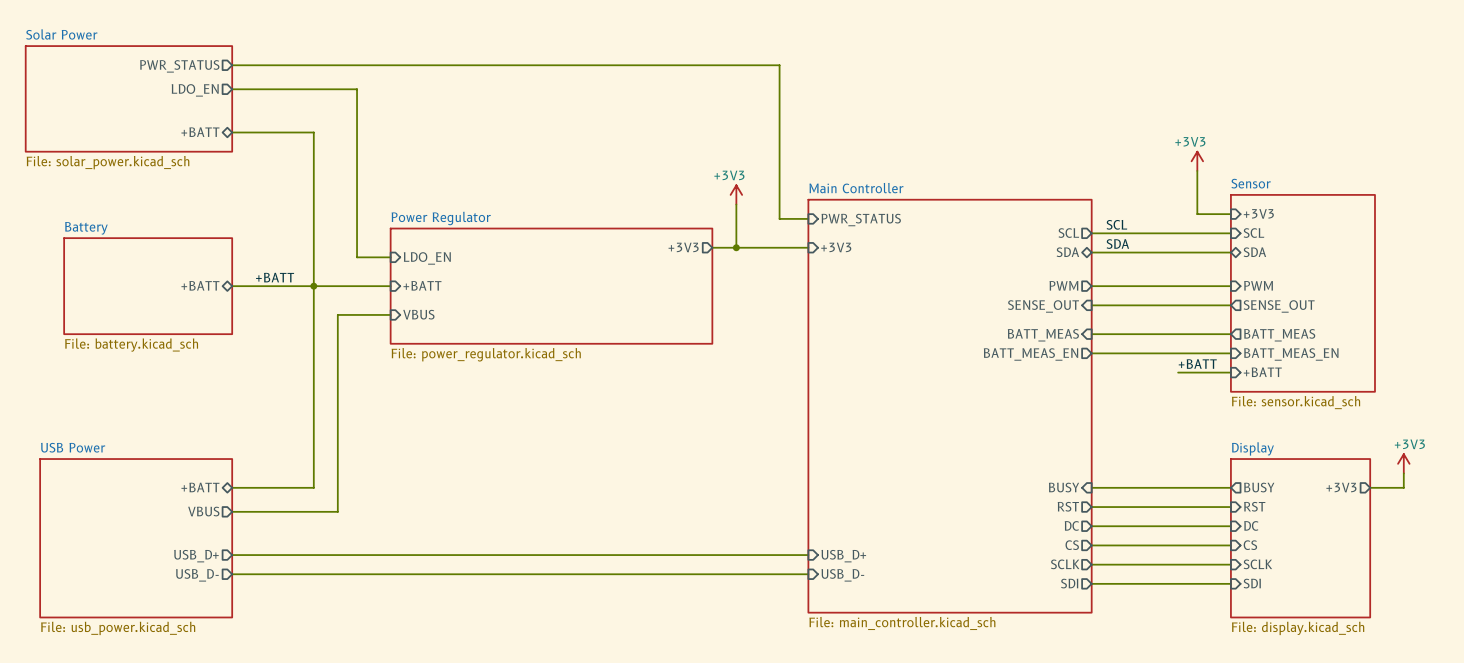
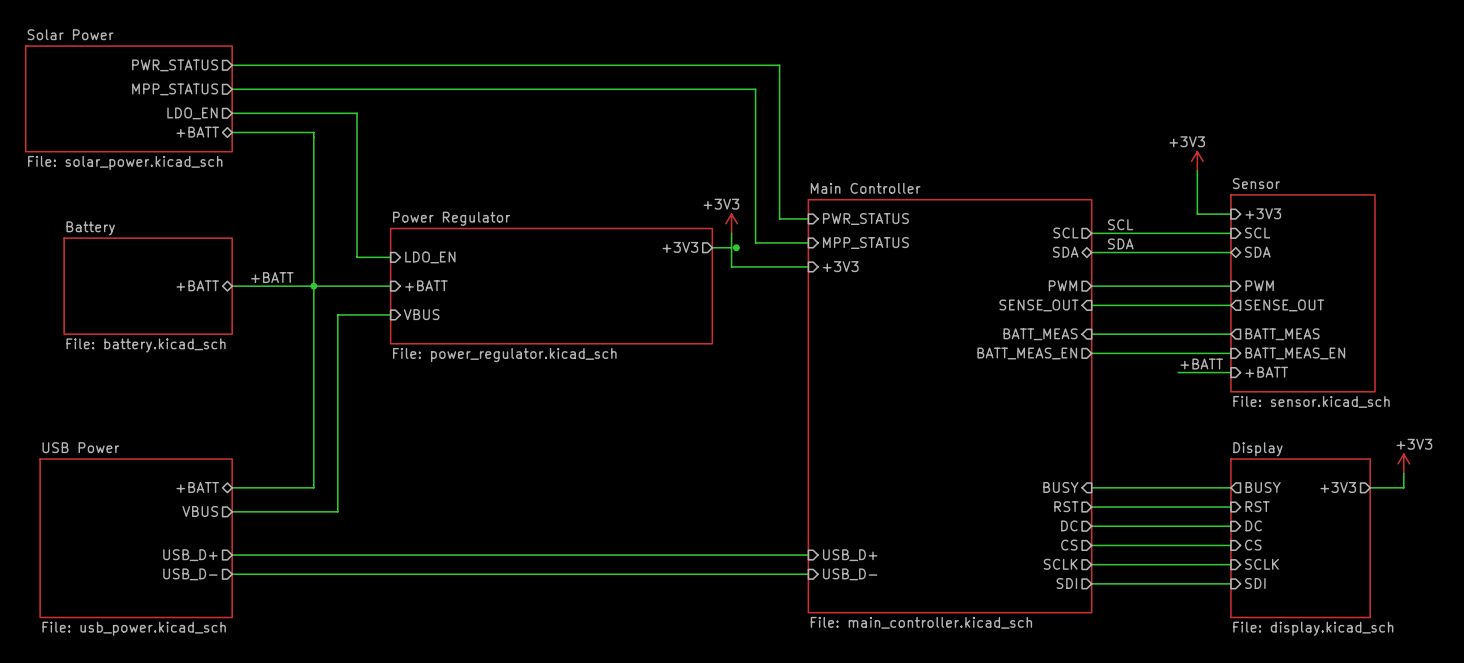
wire: (357, 89) (357, 113) -> (232, 113) (357, 113)
wire: none -> (357, 89) (755, 89) (755, 242) (808, 242)
sheet pin: LDO_EN (195, 90) -> MPP_STATUS (175, 89)
sheet pin: none -> LDO_EN (192, 113)
power symbol position: +3V3 (736, 194) -> +3V3 (731, 223)
wire: (736, 204) (736, 247) -> none
wire: none -> (731, 233) (731, 266) (808, 266)
sheet pin: none -> MPP_STATUS (865, 243)
wire: (731, 247) (808, 247) -> none
sheet pin position: +3V3 (836, 247) -> +3V3 (840, 266)

